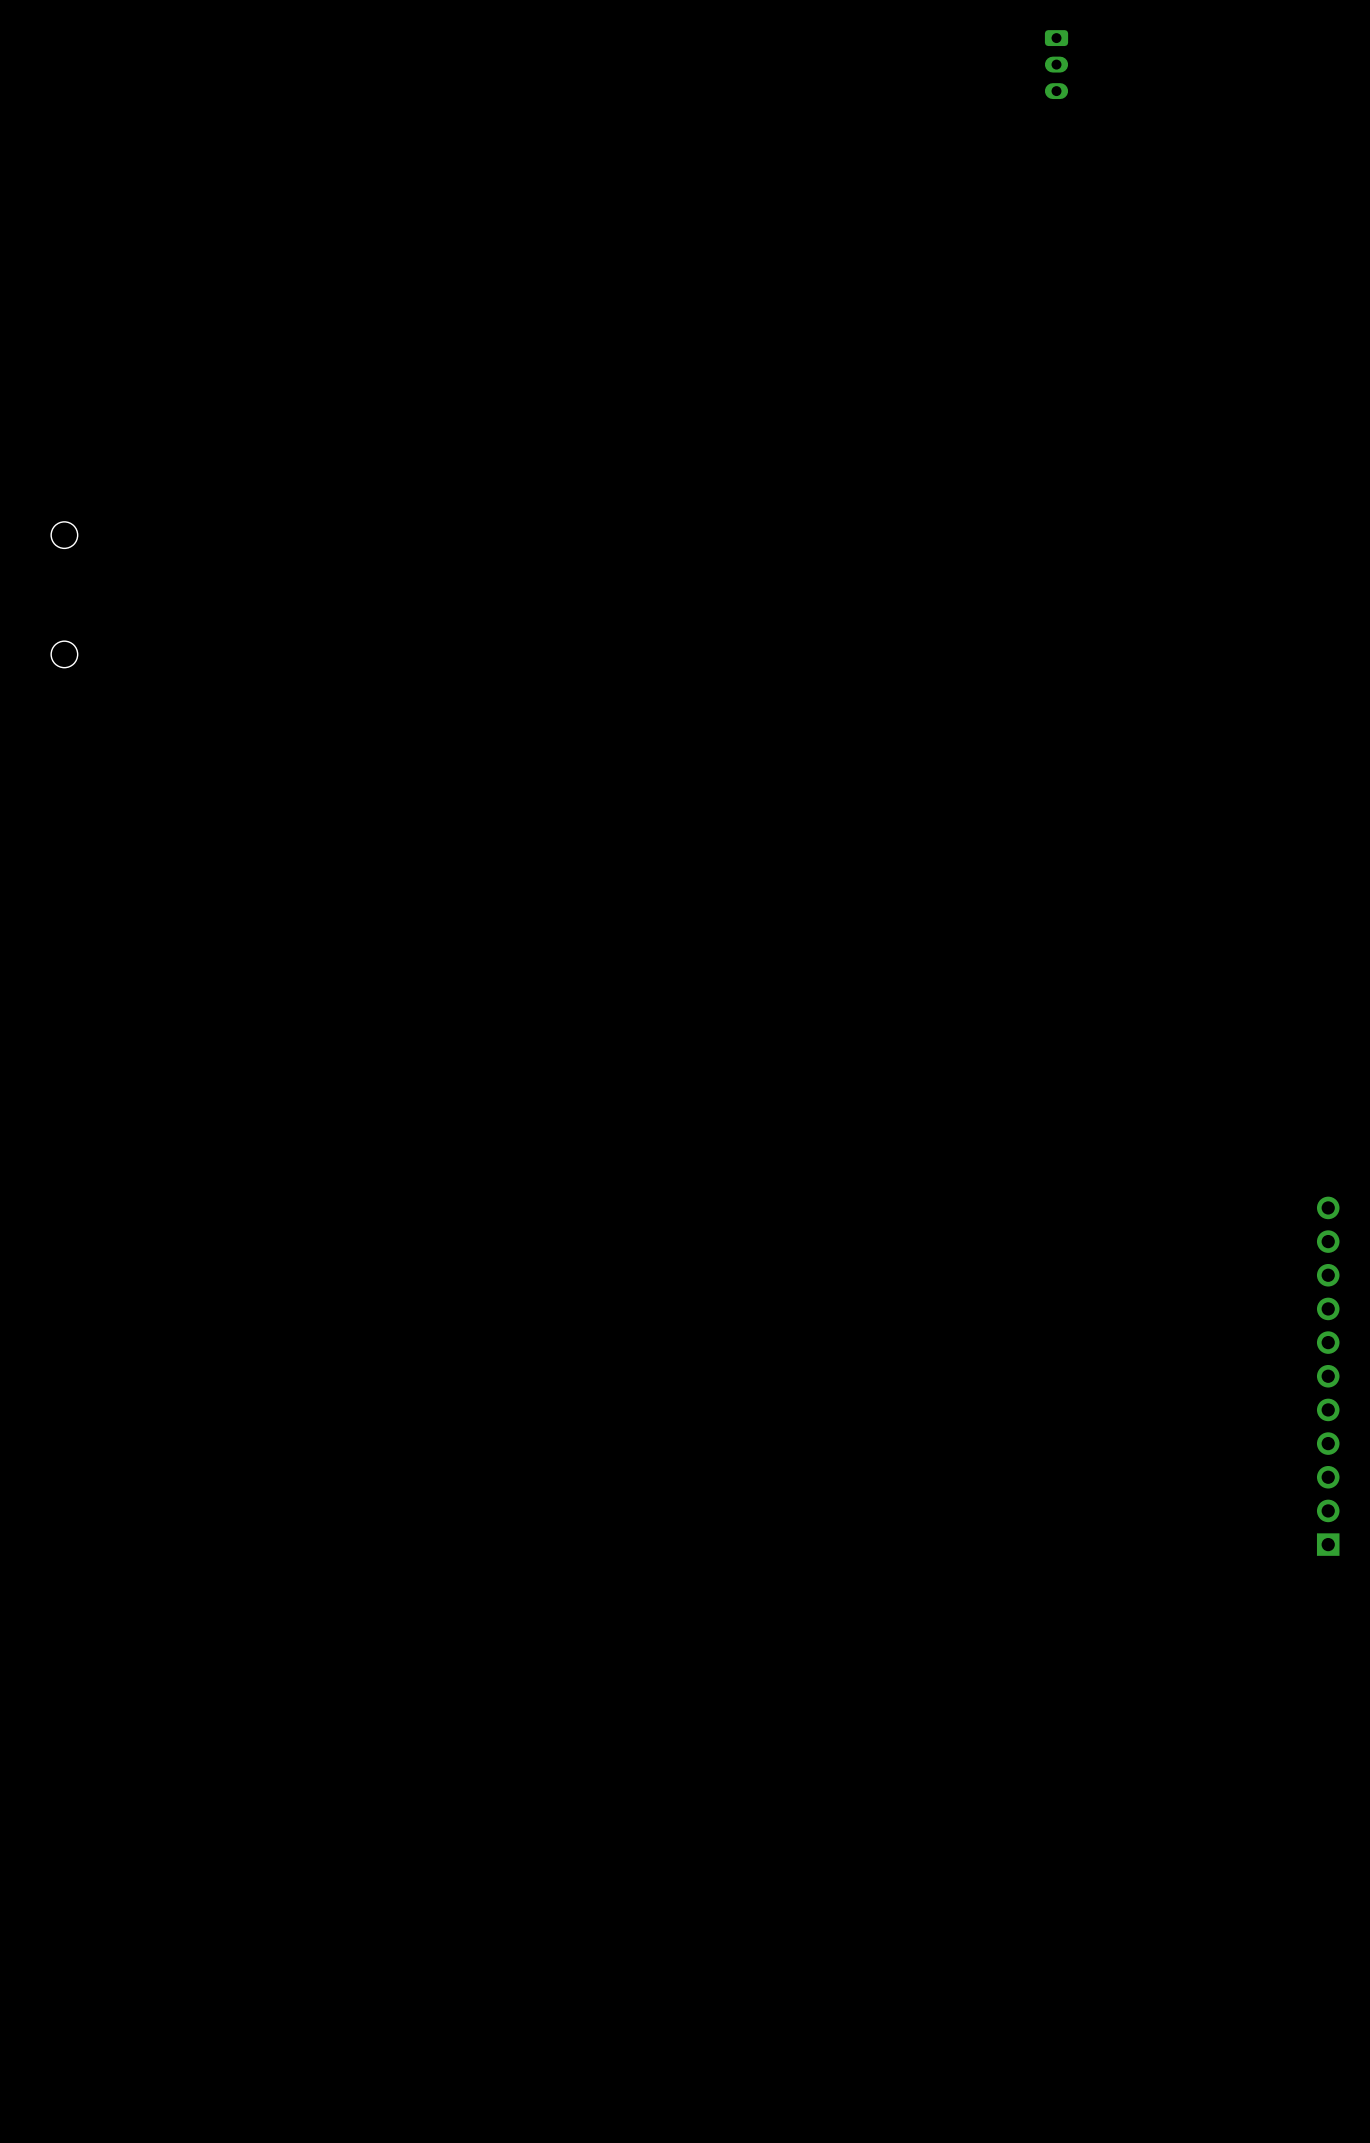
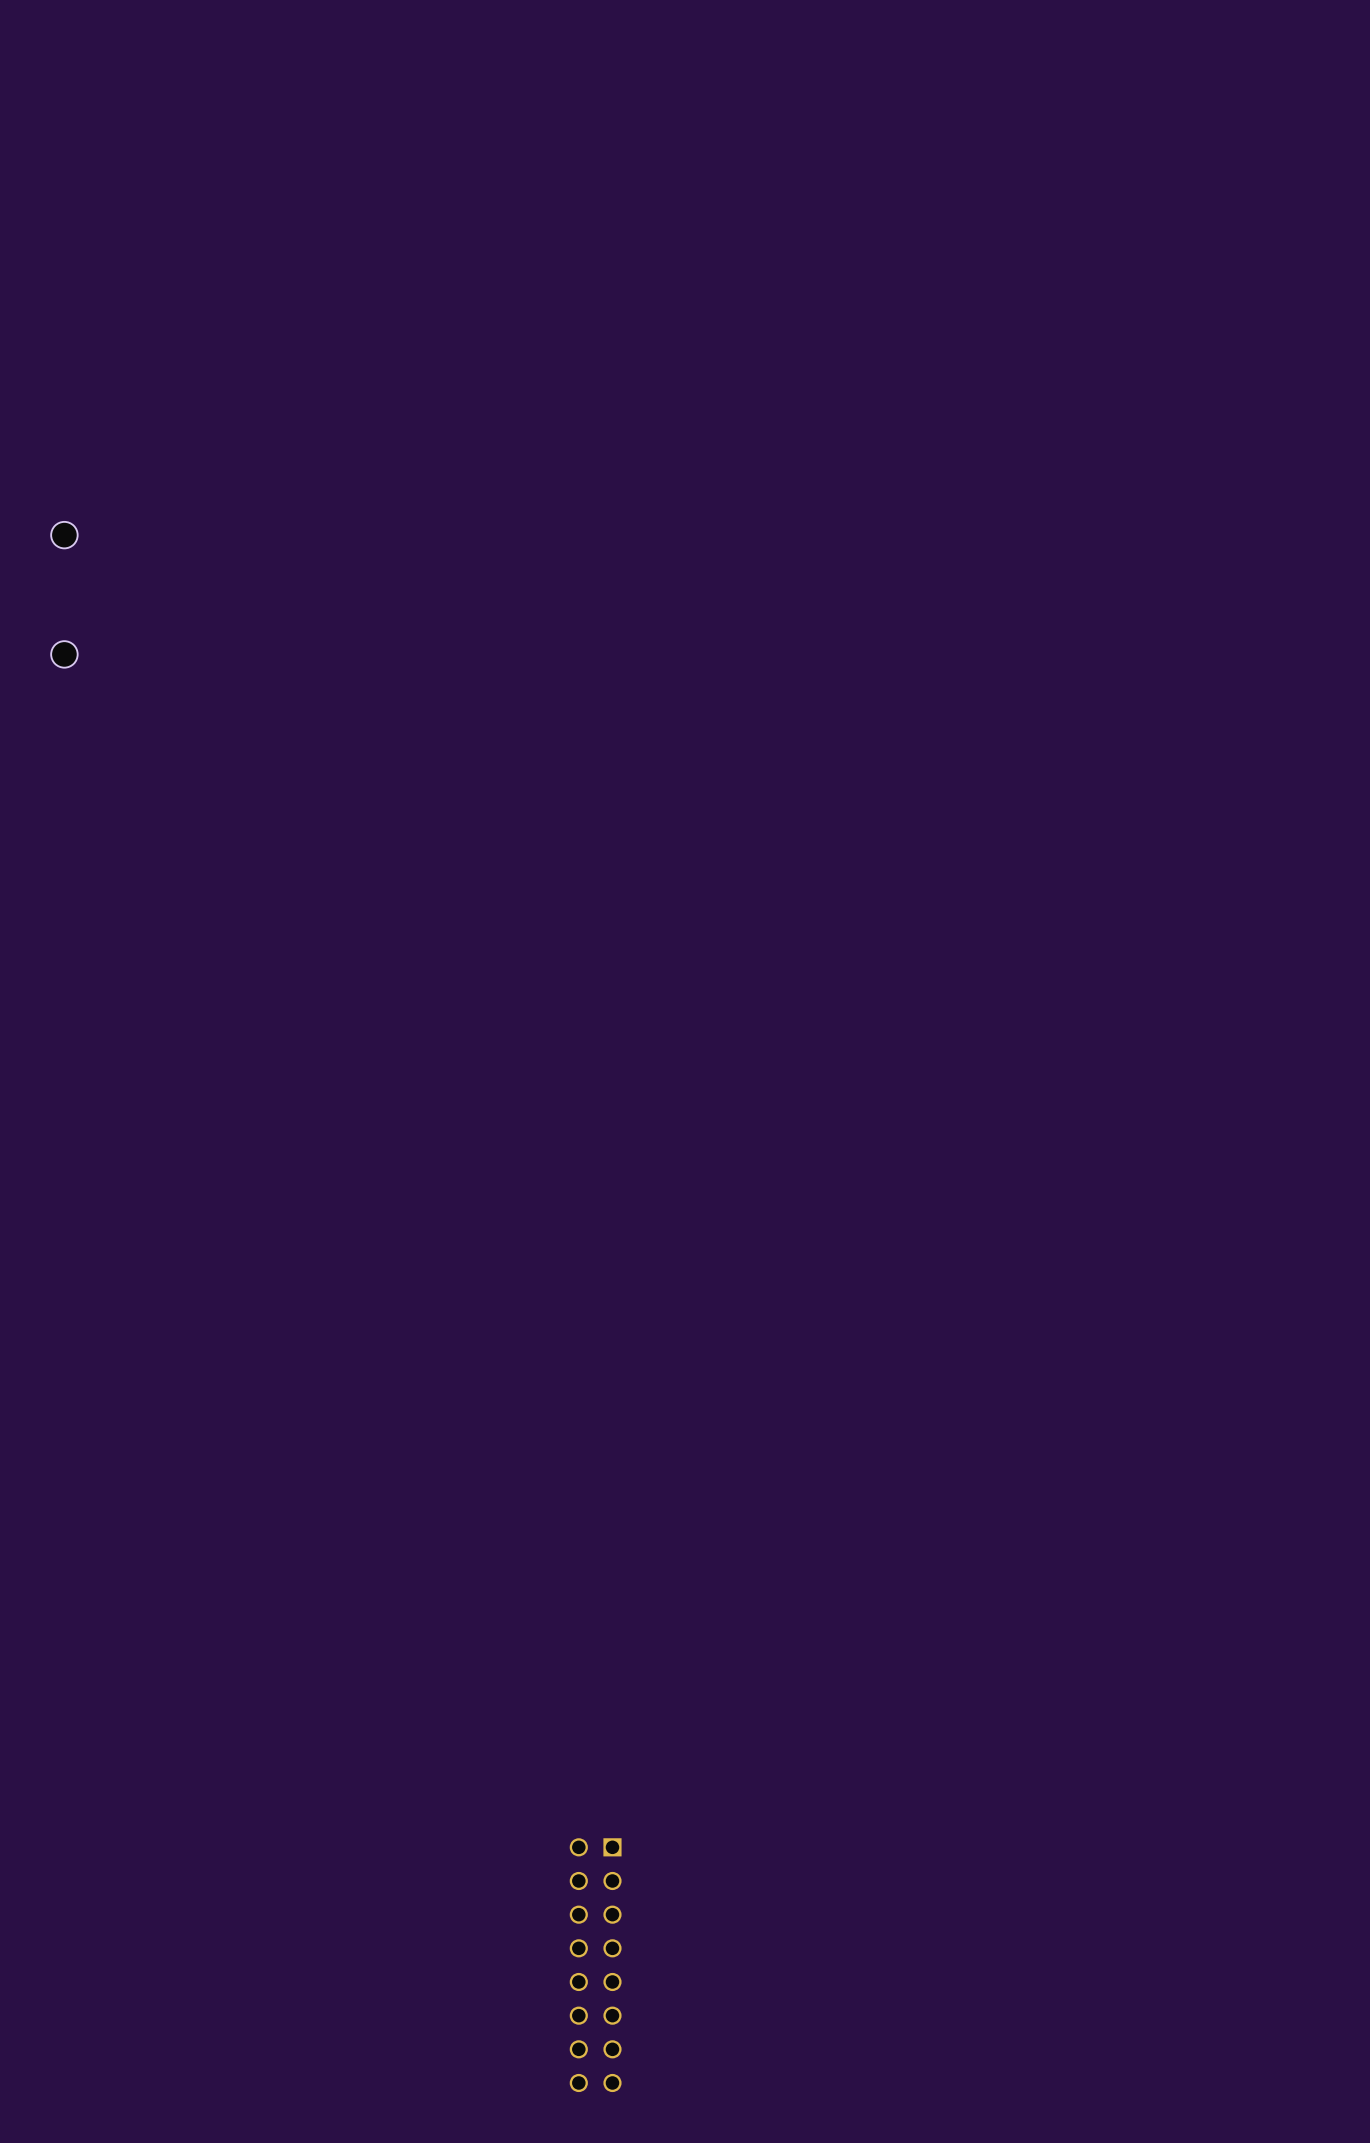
part: (1056, 64) -> none
part: (1328, 1376) -> none
part: none -> (595, 1965)

